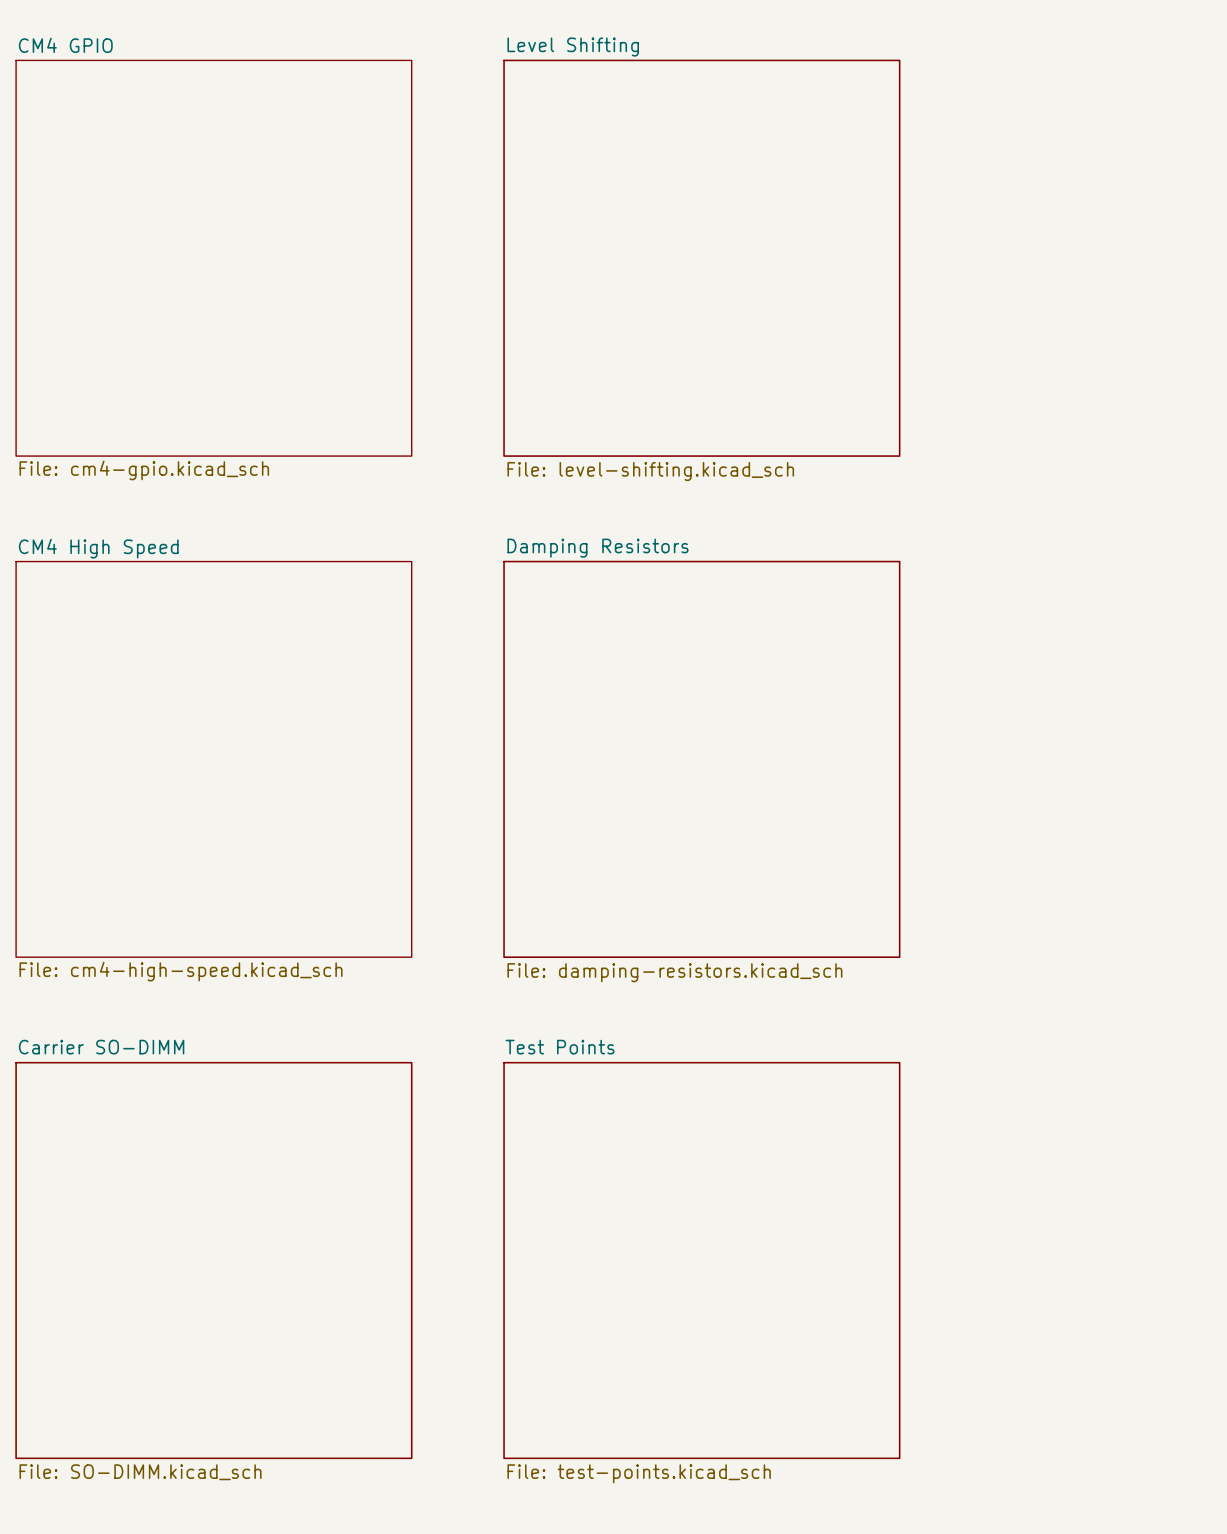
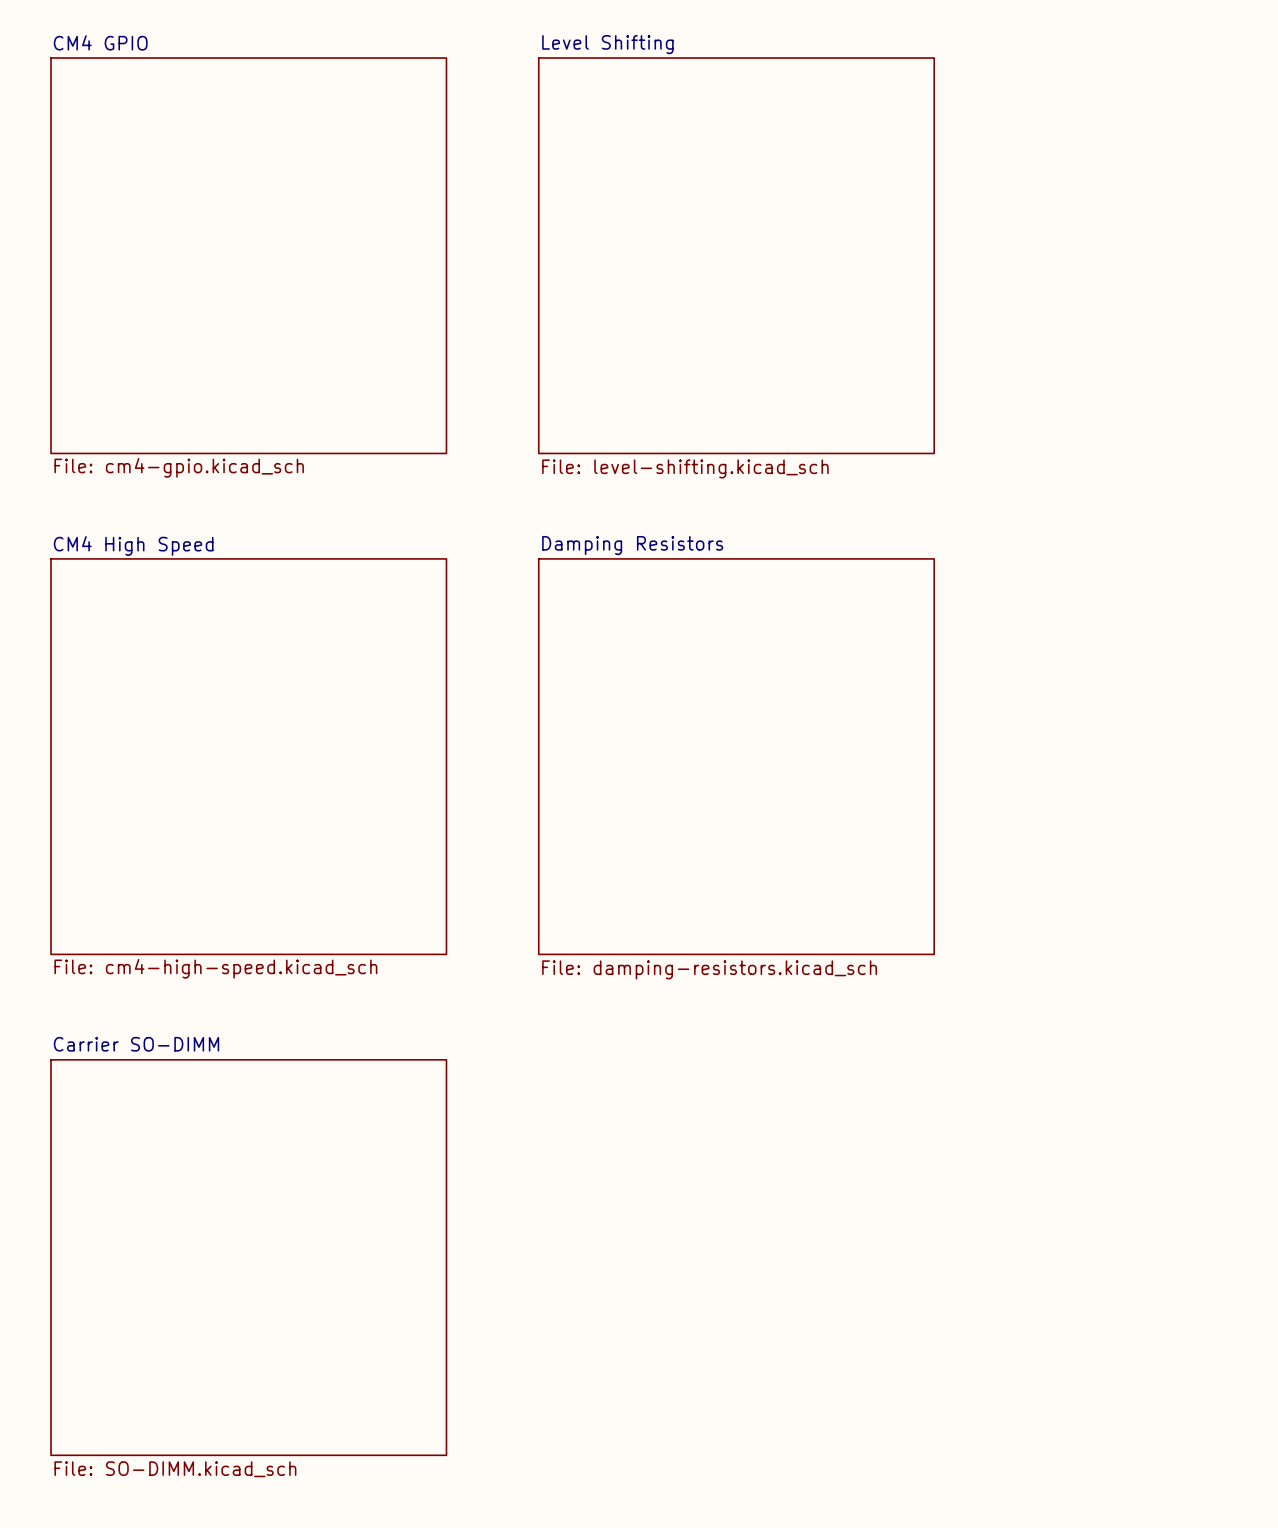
sheet Test Points: File: test-points.kicad_sch (701, 1260) -> none

